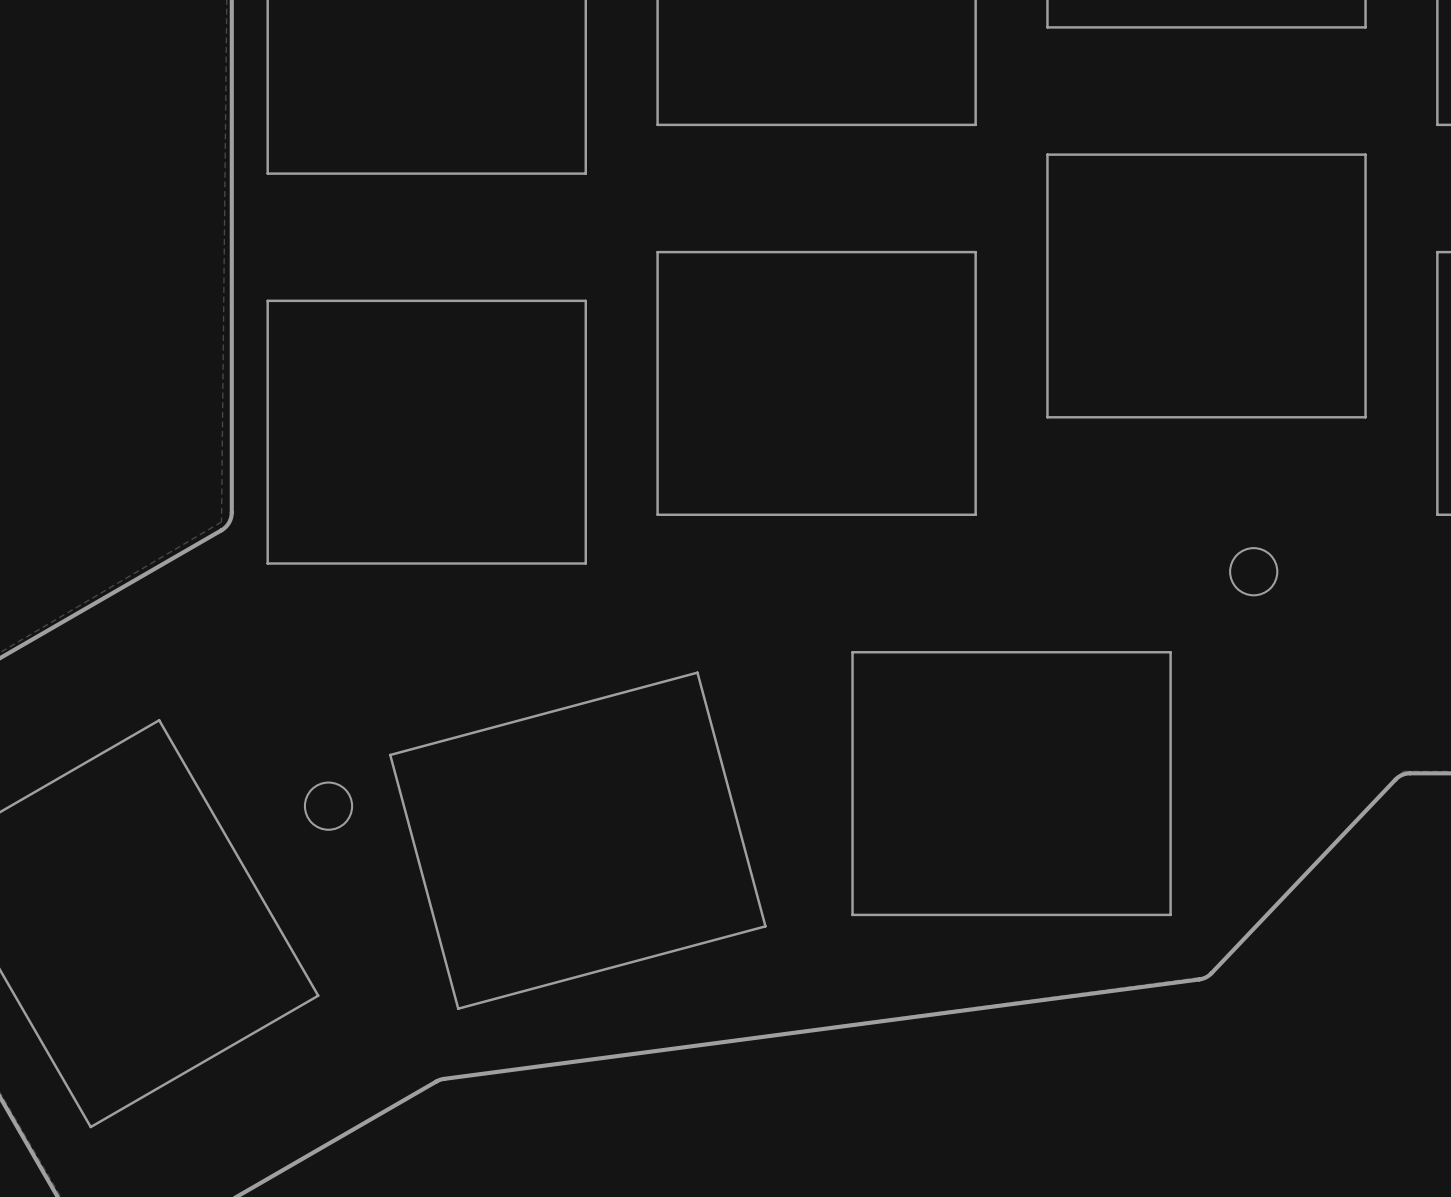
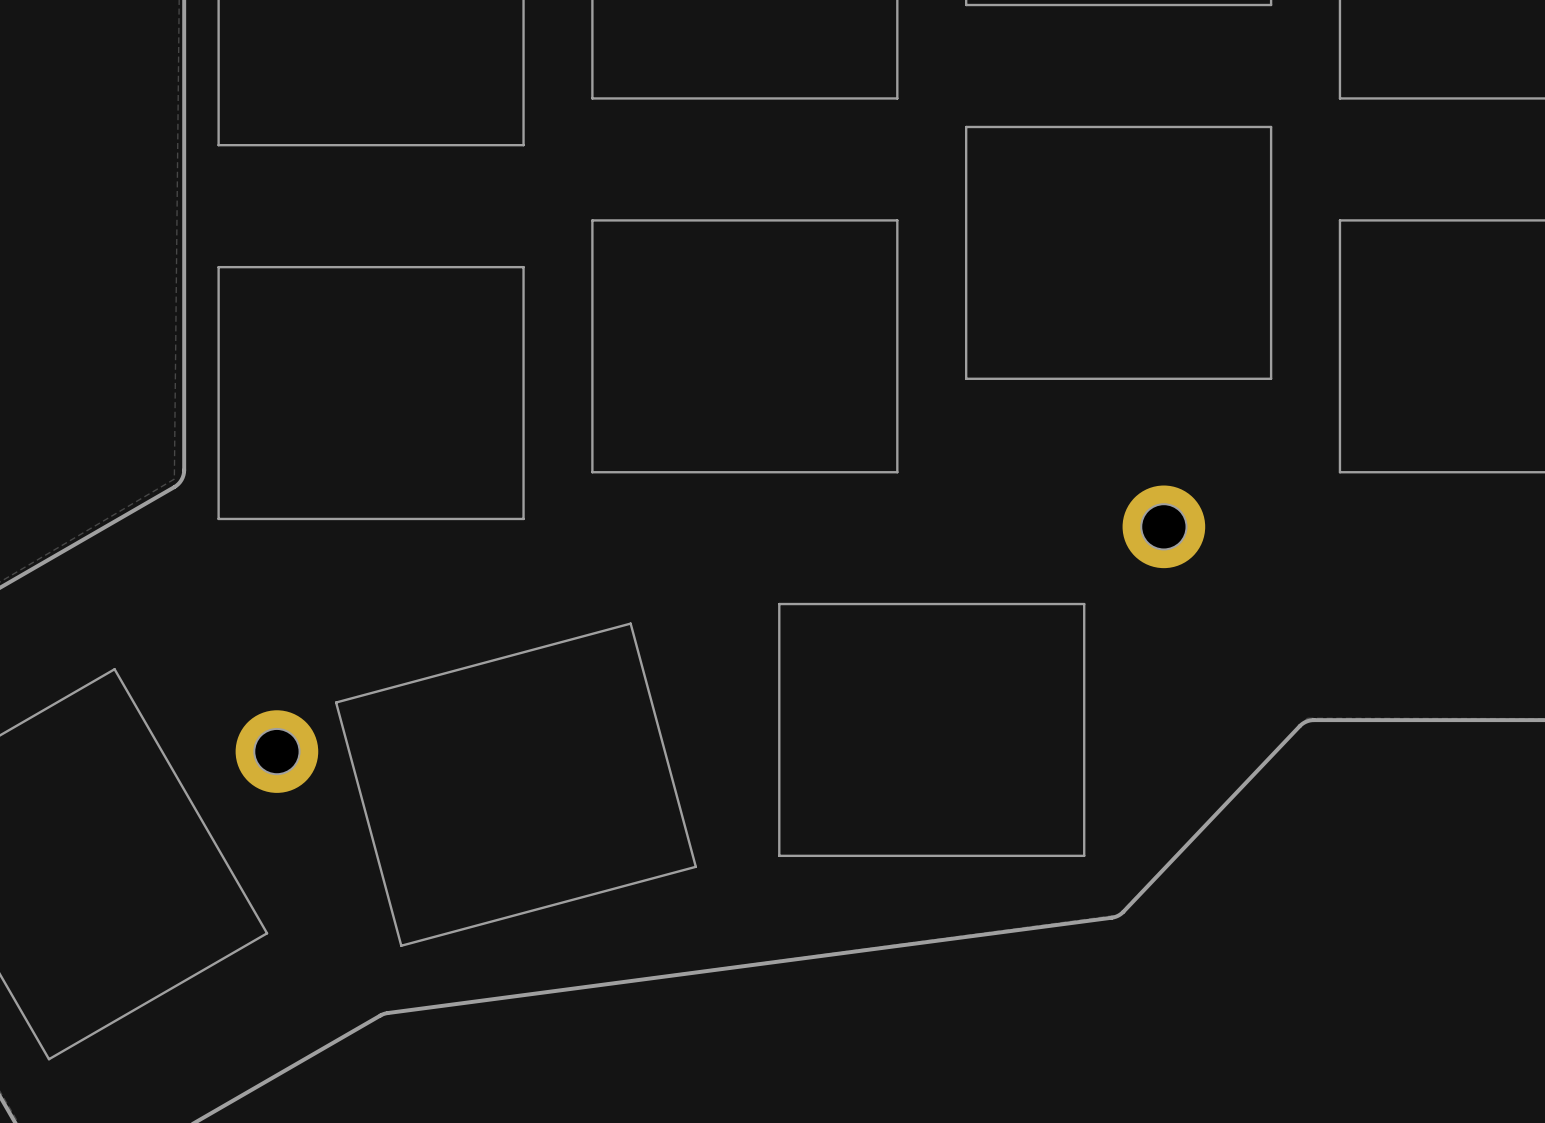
drawing: [1229, 547, 1279, 597] -> none
part: none -> (1163, 526)
drawing: [303, 781, 354, 831] -> none
part: none -> (276, 751)

